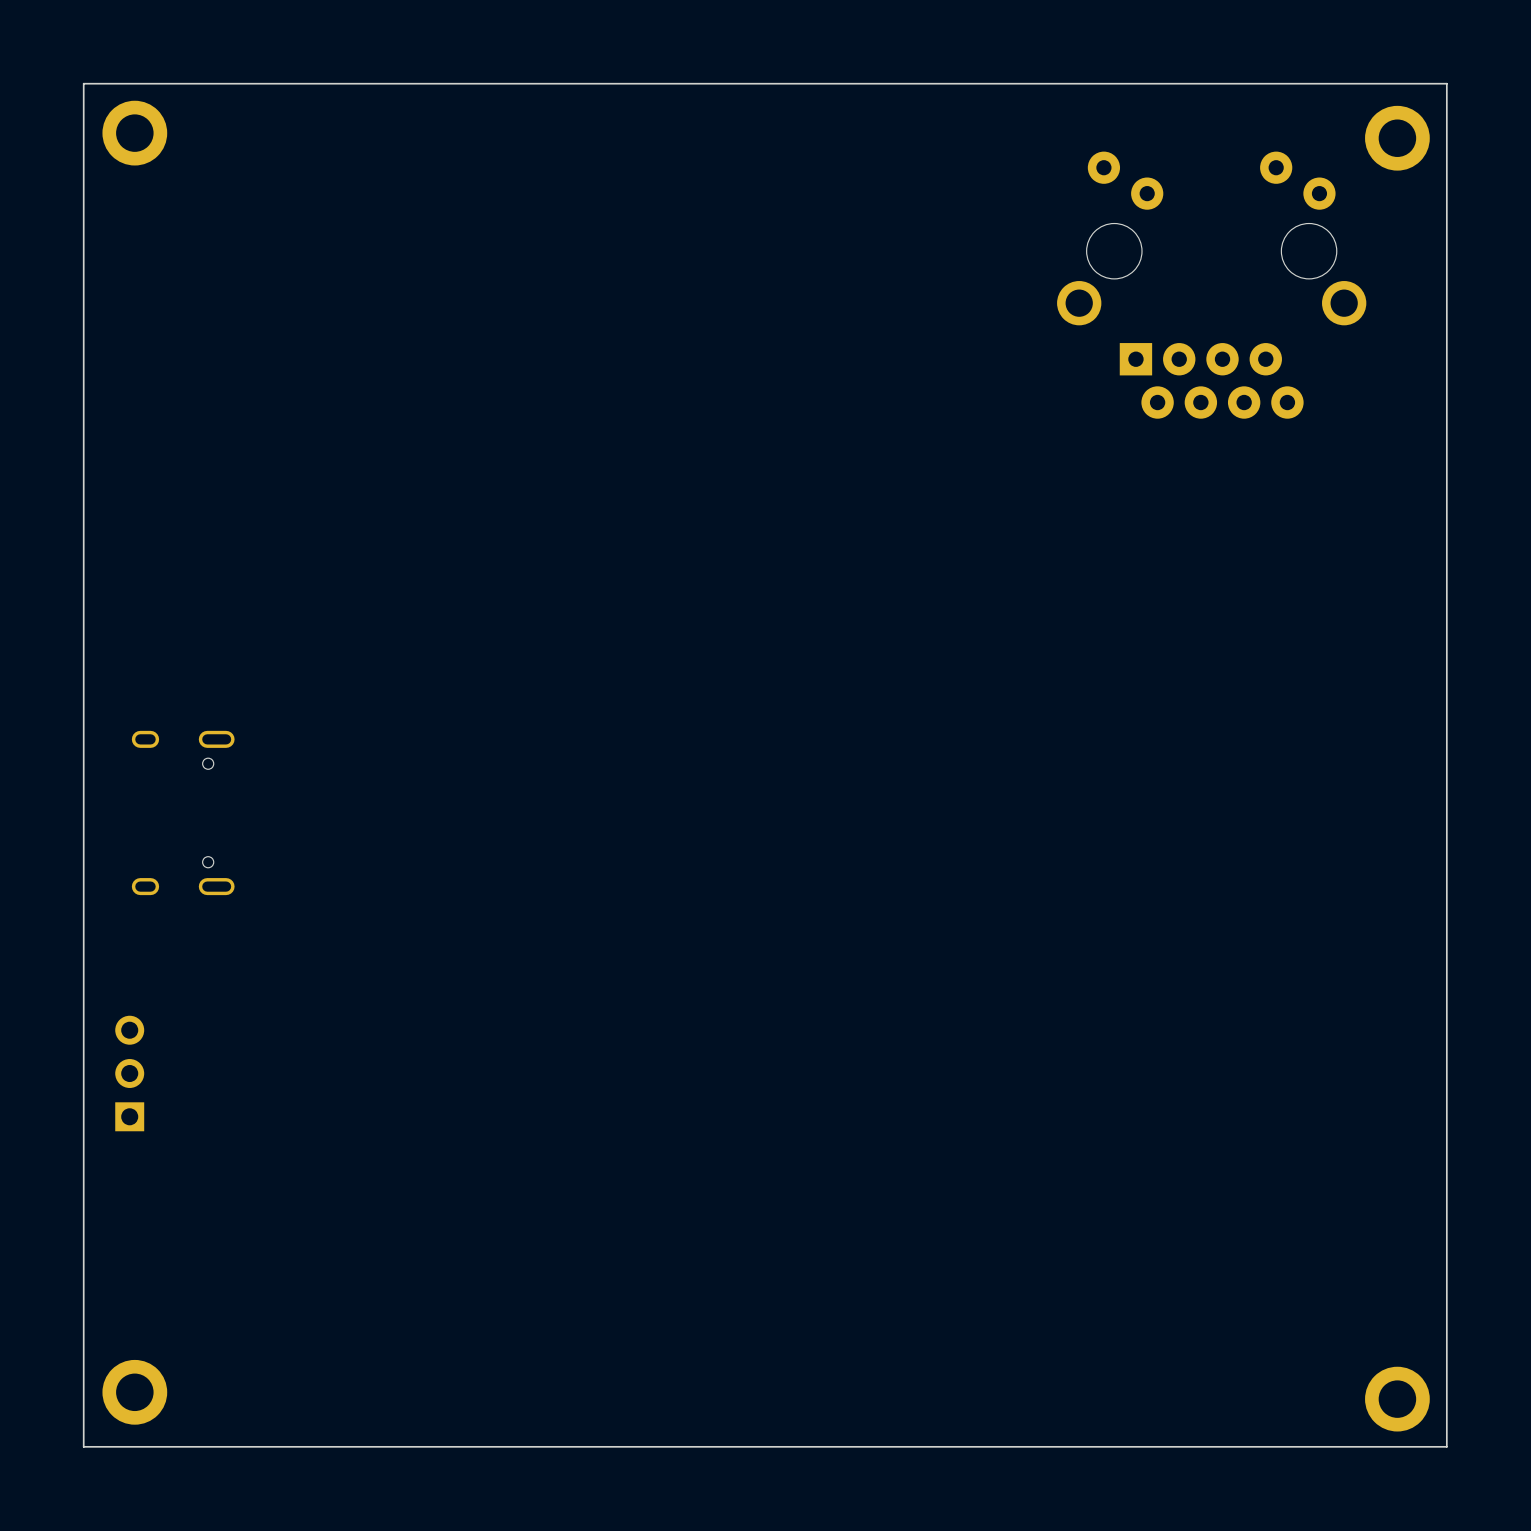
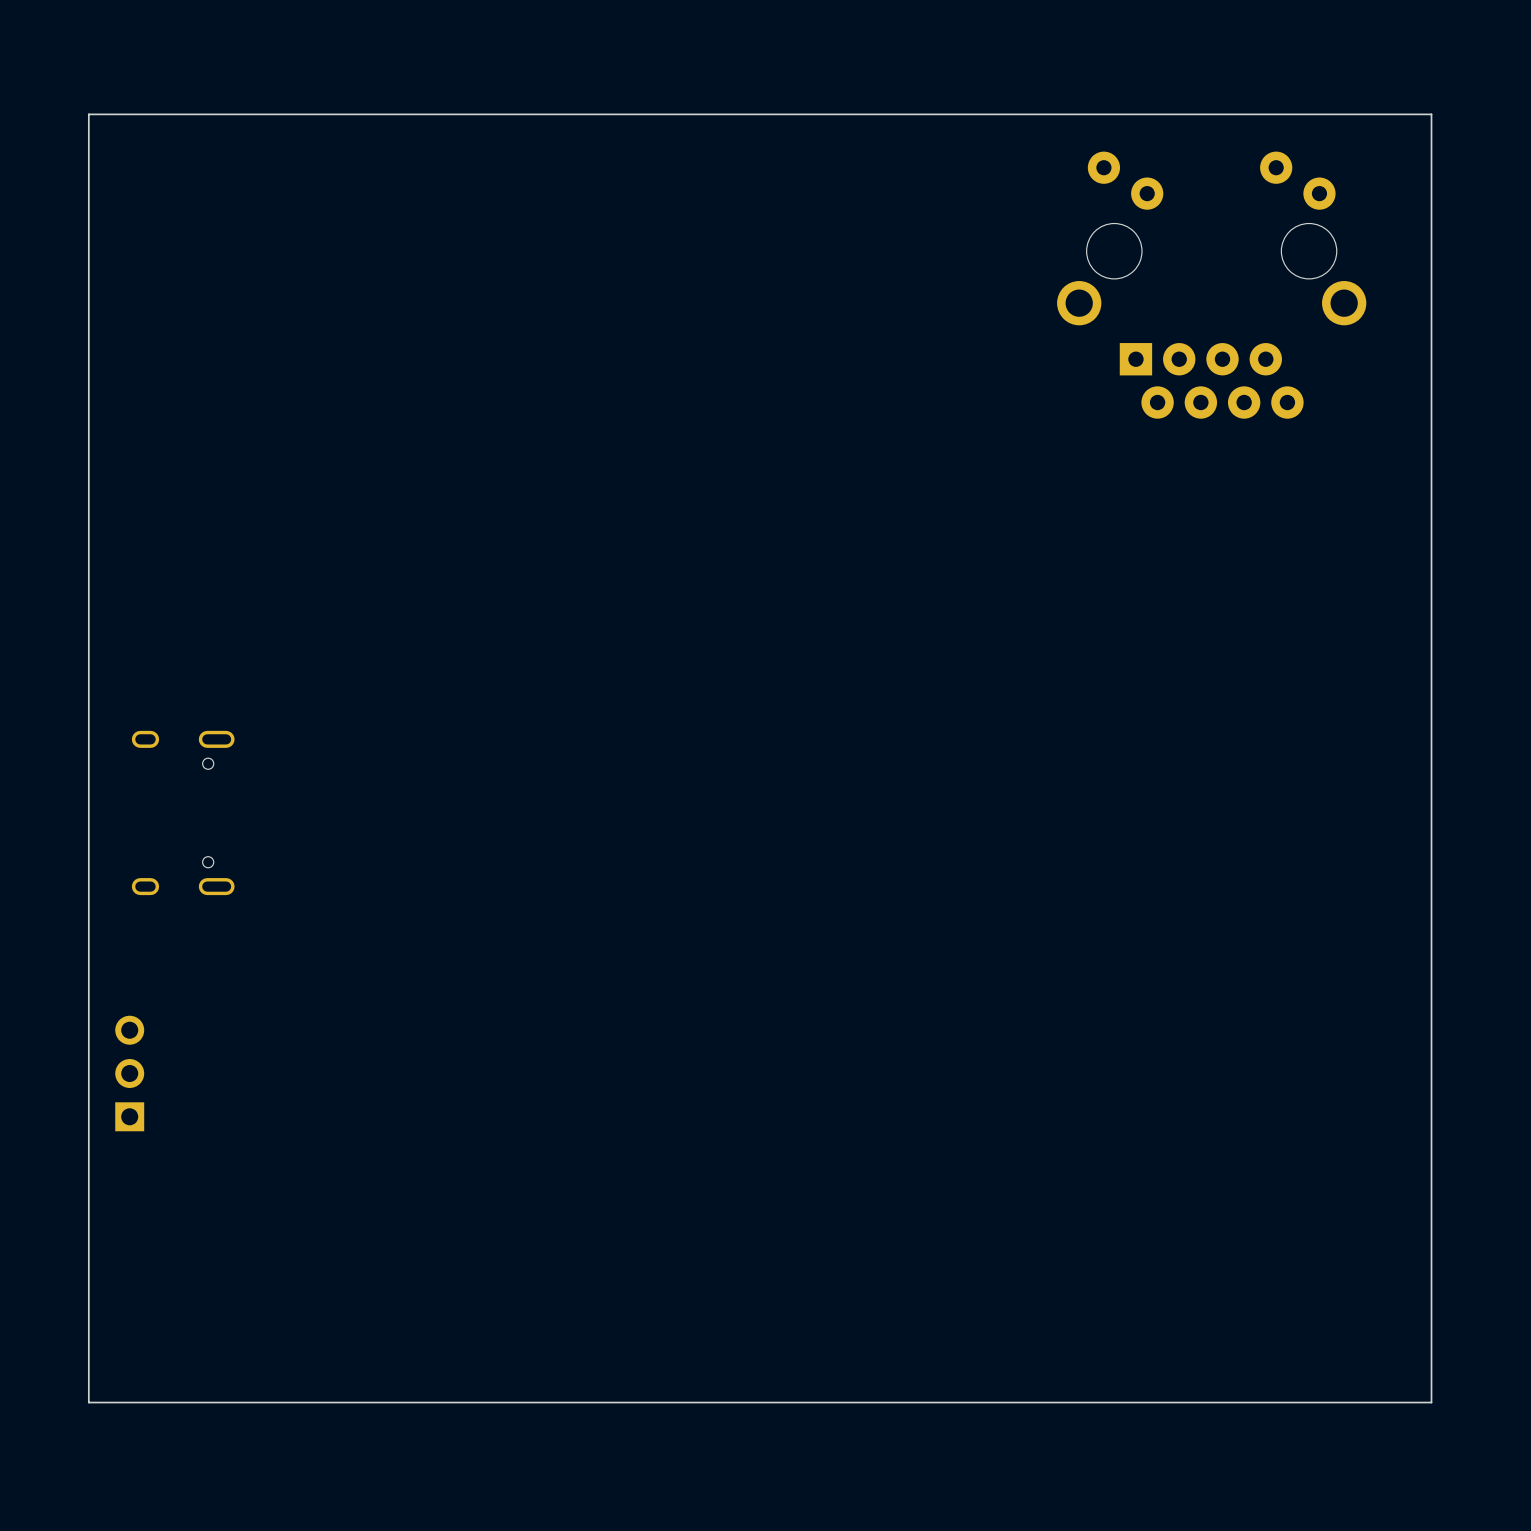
board edge: (1446, 83) (83, 83) (83, 1446) (1446, 1446) (1446, 83) -> (1431, 114) (1431, 1402) (88, 1402) (88, 114) (1431, 114)
part: (134, 133) -> none
part: (1397, 138) -> none
part: (134, 1392) -> none
part: (1397, 1399) -> none

